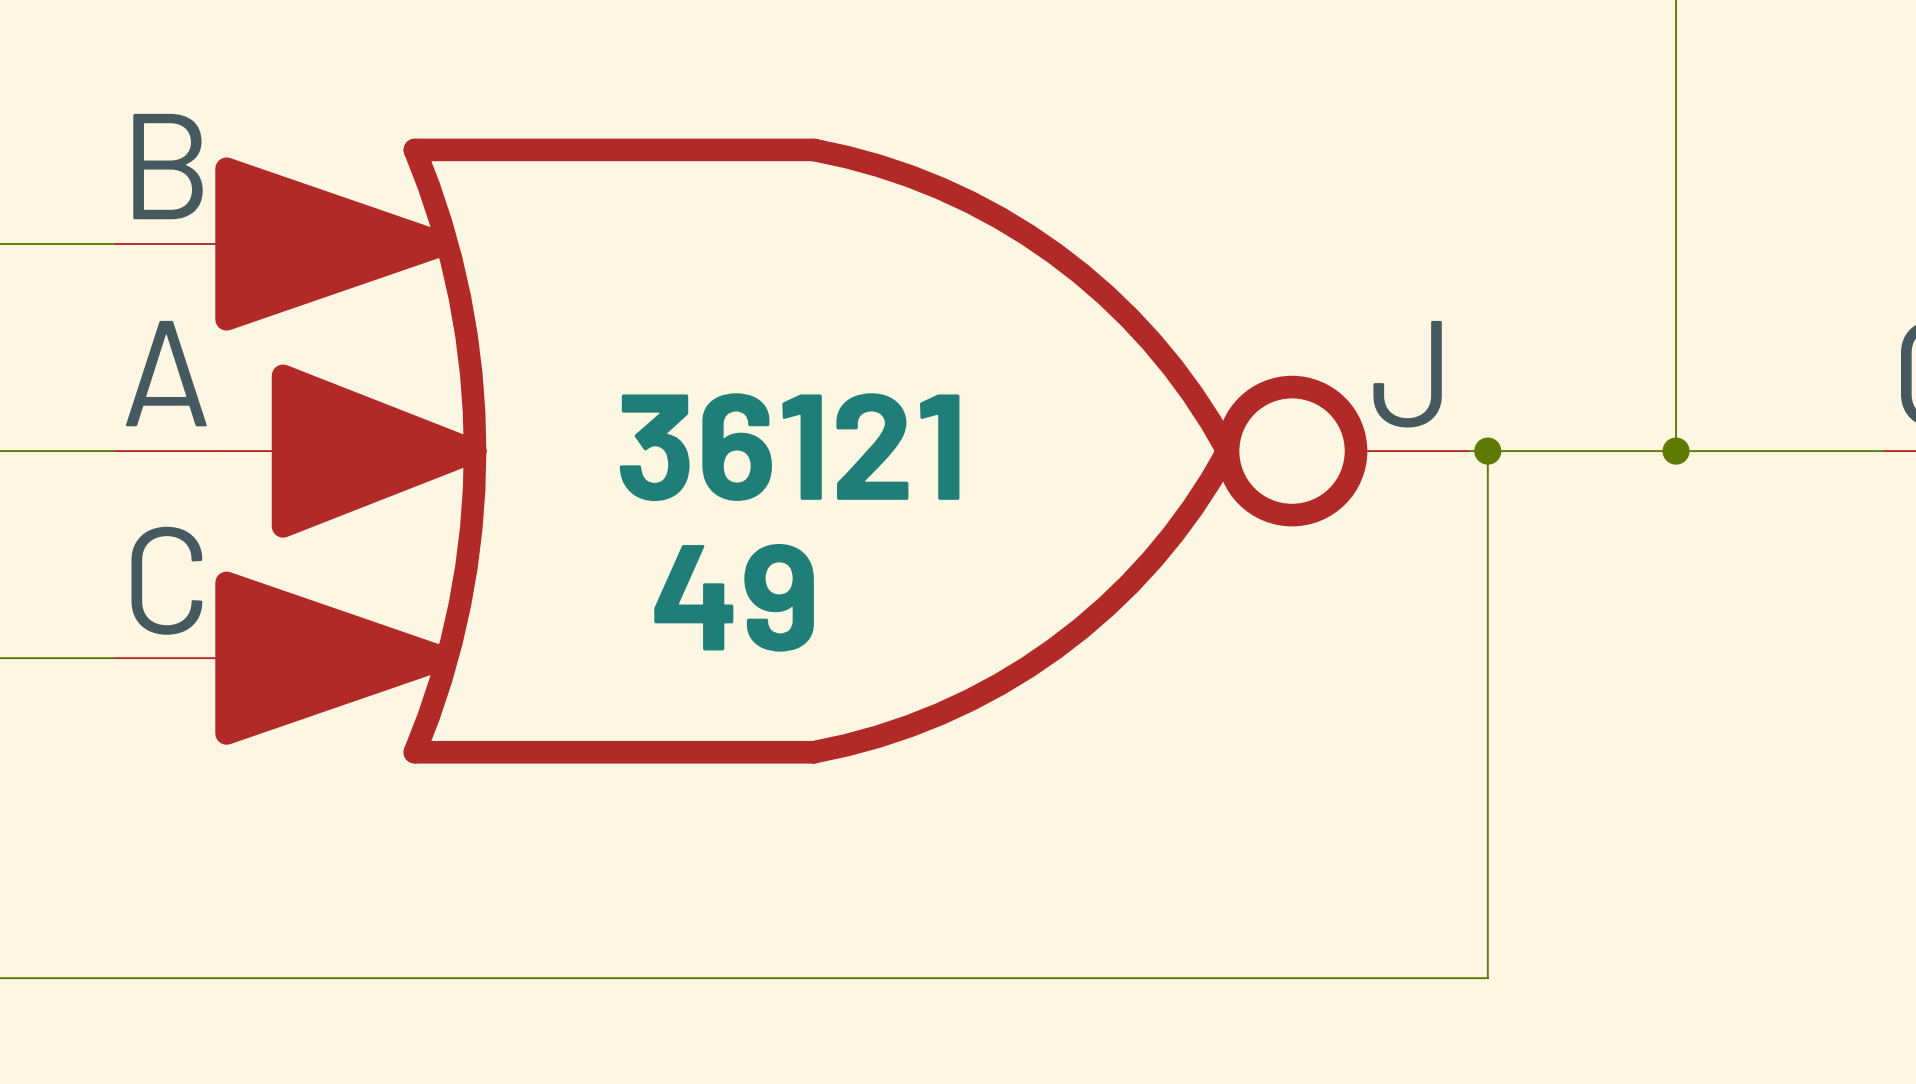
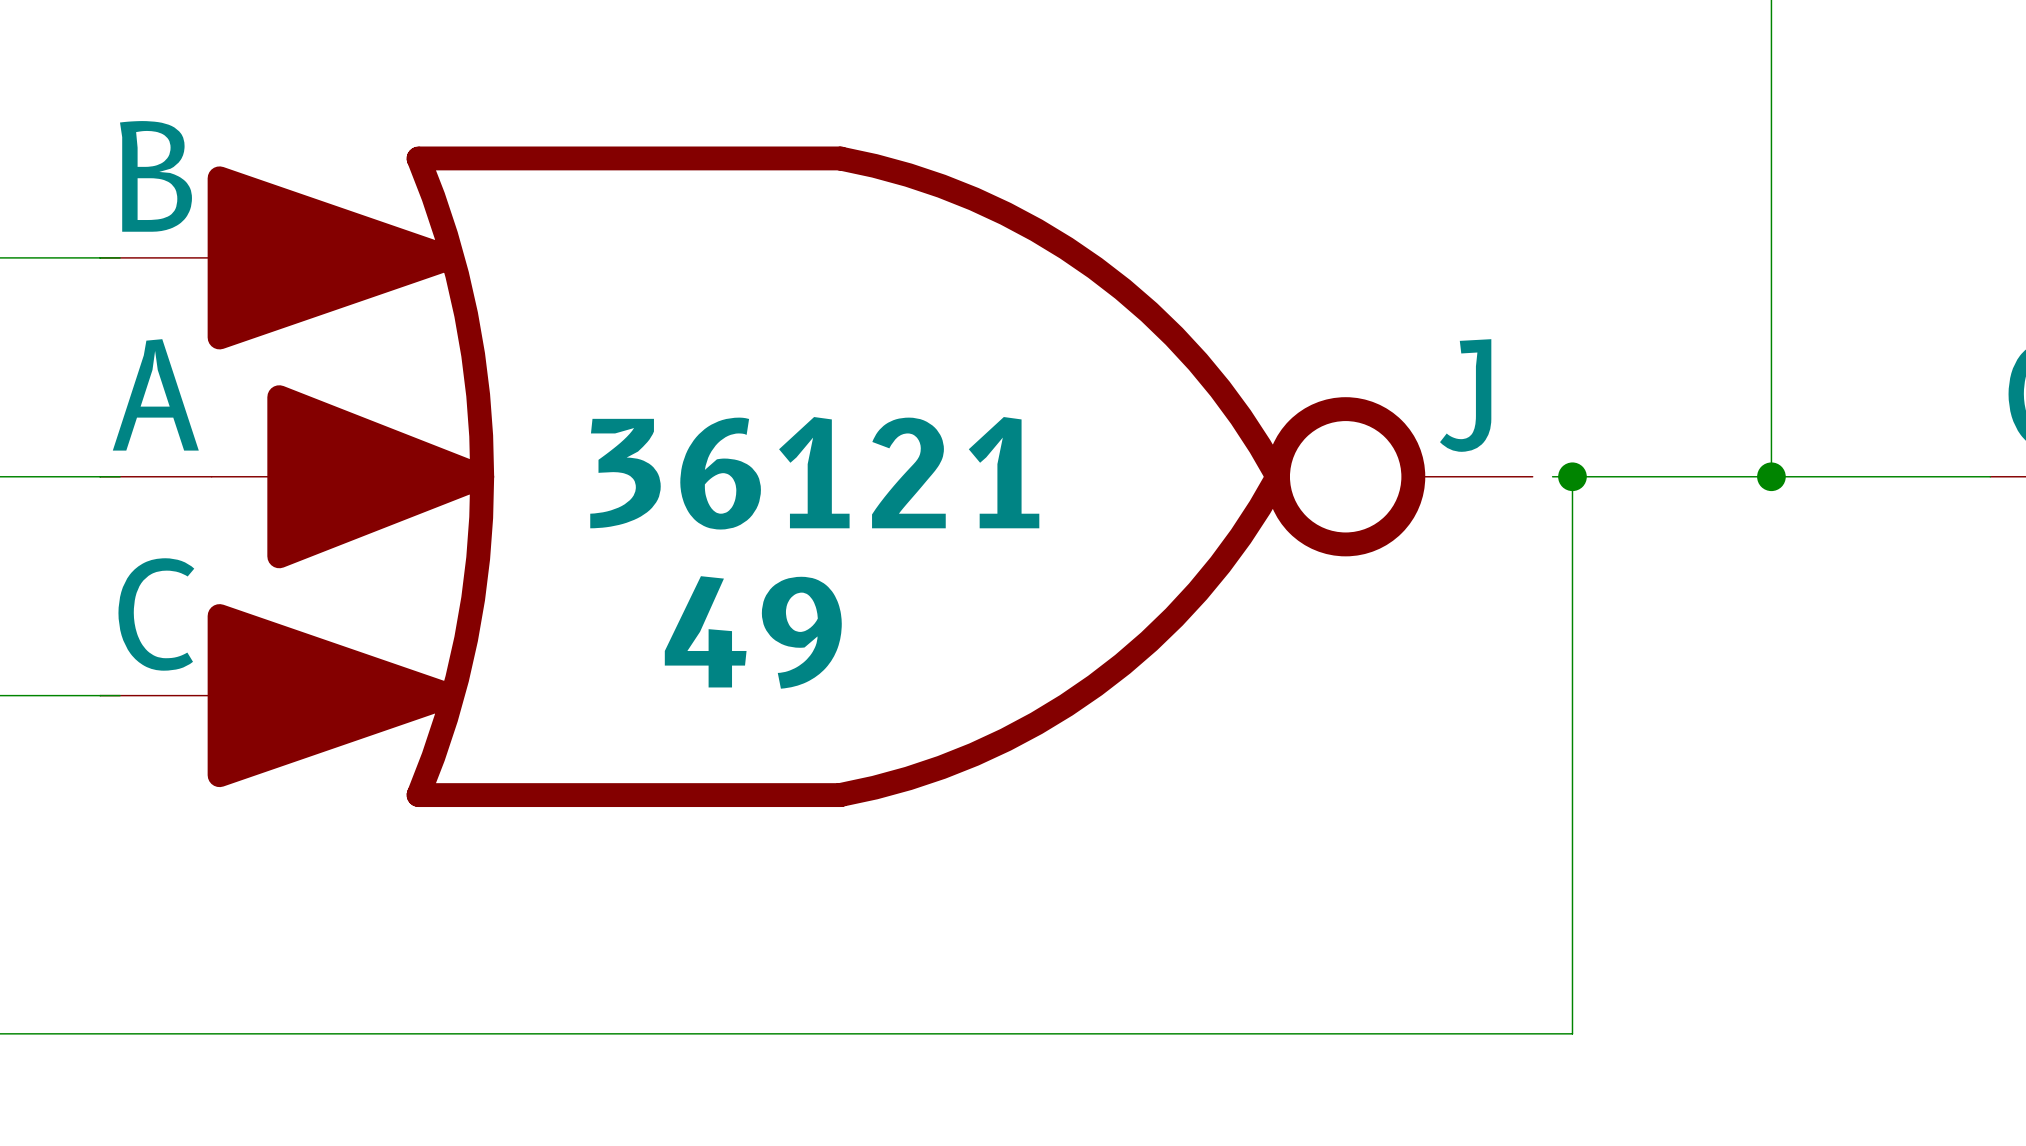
part position: (791, 451) -> (816, 476)

